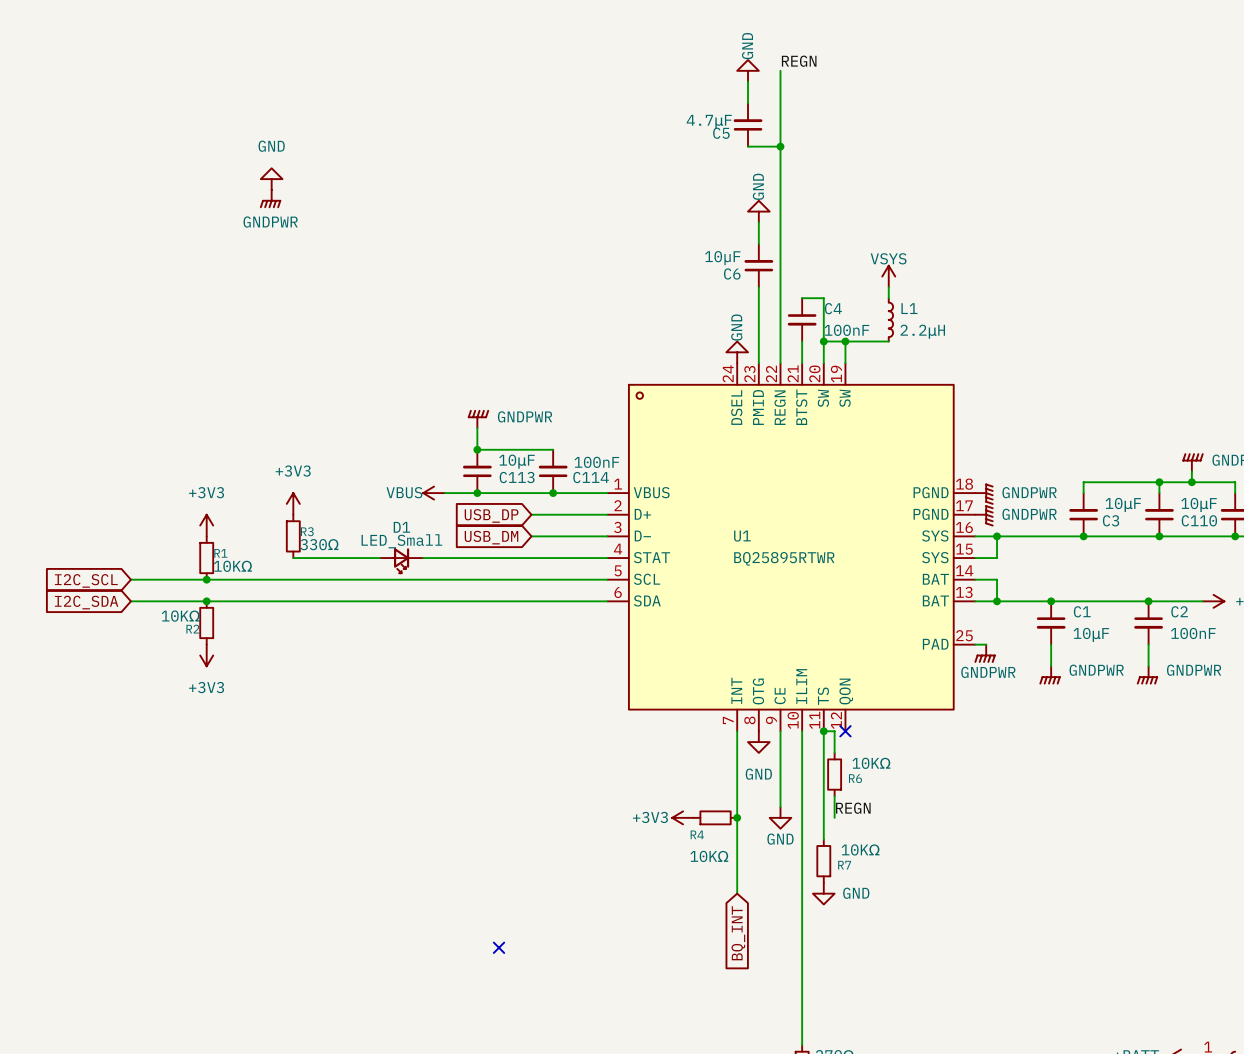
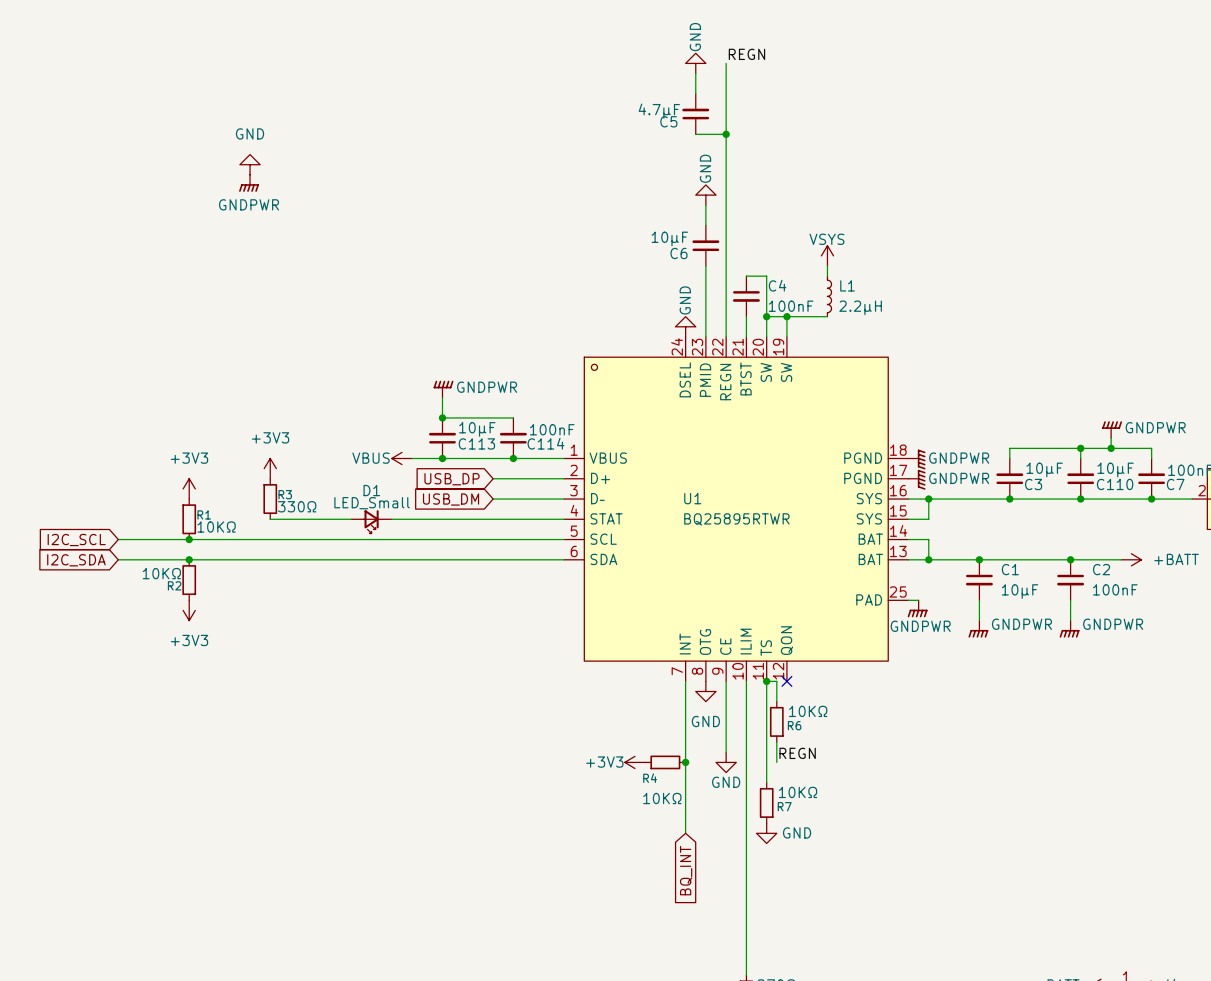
no-connect mark: (499, 947) -> none

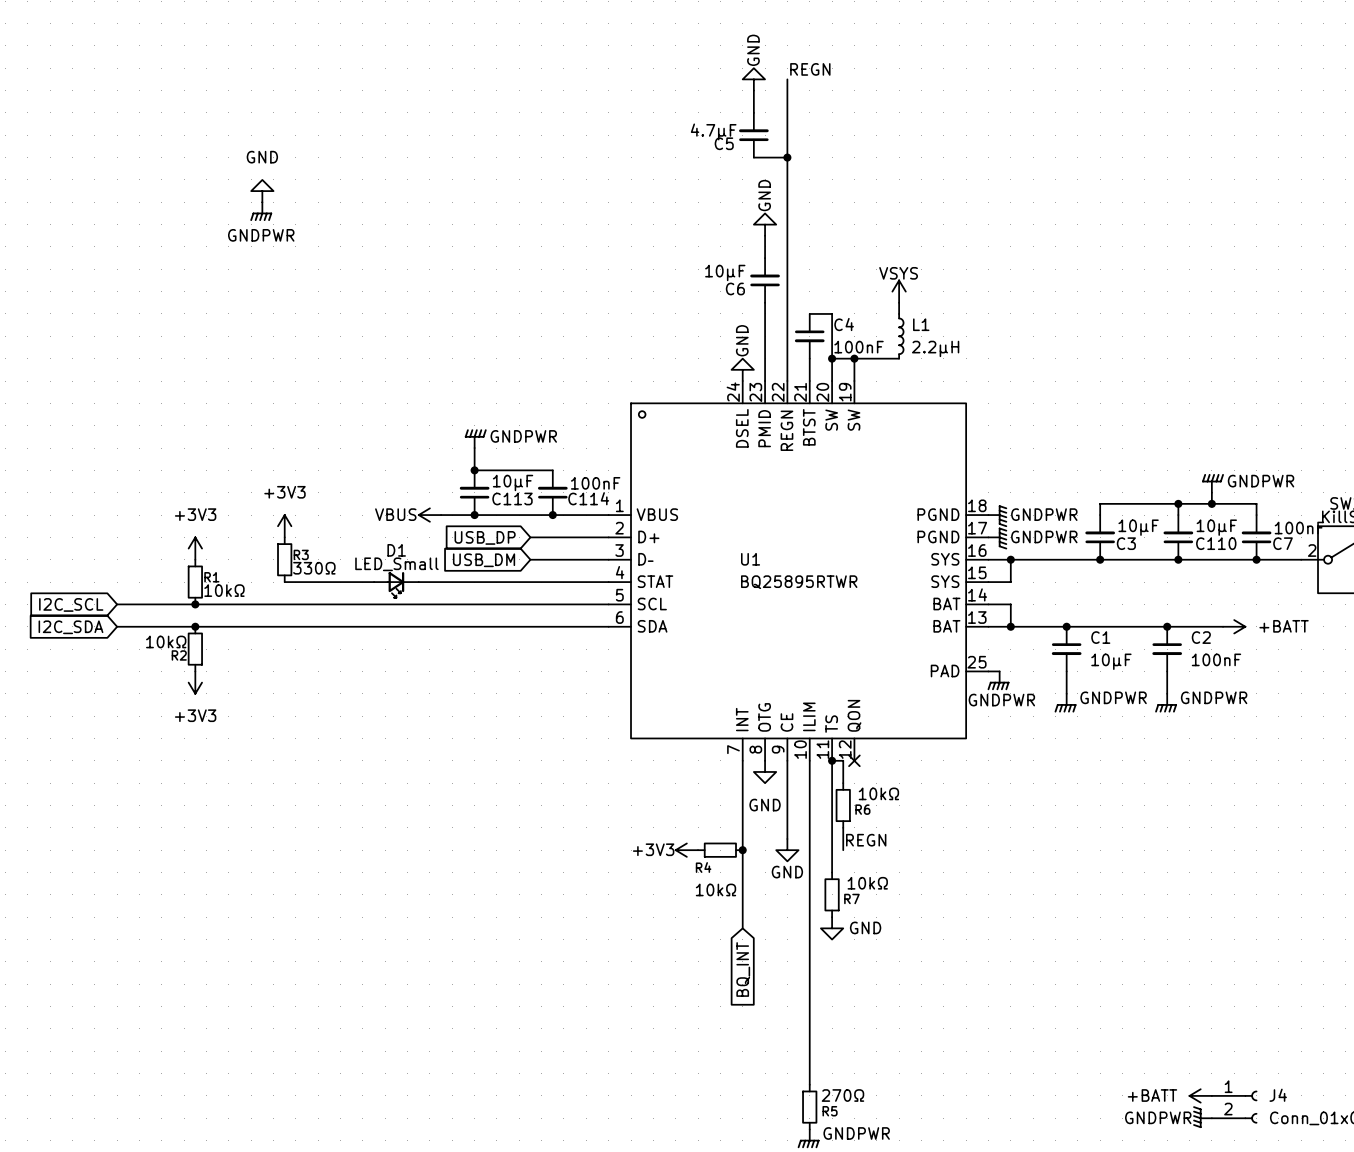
R1 value: 10KΩ (216, 527) -> 10kΩ (224, 590)
R2 value: 10KΩ (161, 573) -> 10kΩ (166, 641)
R6 value: 10KΩ (808, 711) -> 10kΩ (878, 793)
R7 value: 10KΩ (798, 792) -> 10kΩ (867, 883)
R4 value: 10KΩ (662, 798) -> 10kΩ (715, 889)

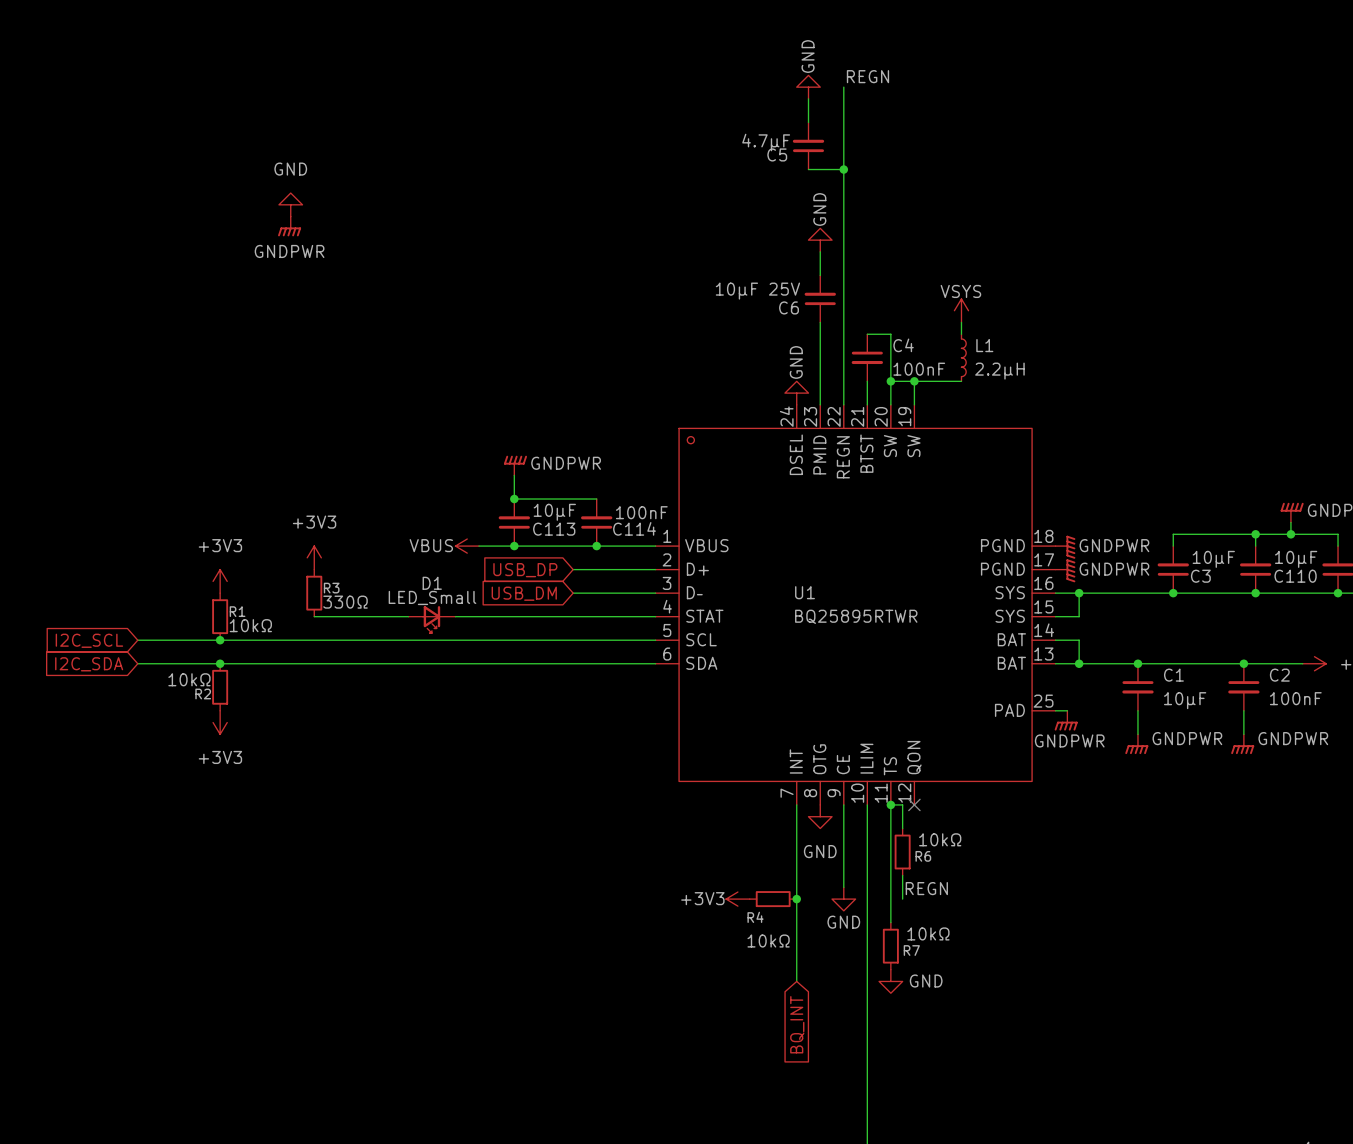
C6 value: 10μF (725, 272) -> 10μF 25V (757, 291)

